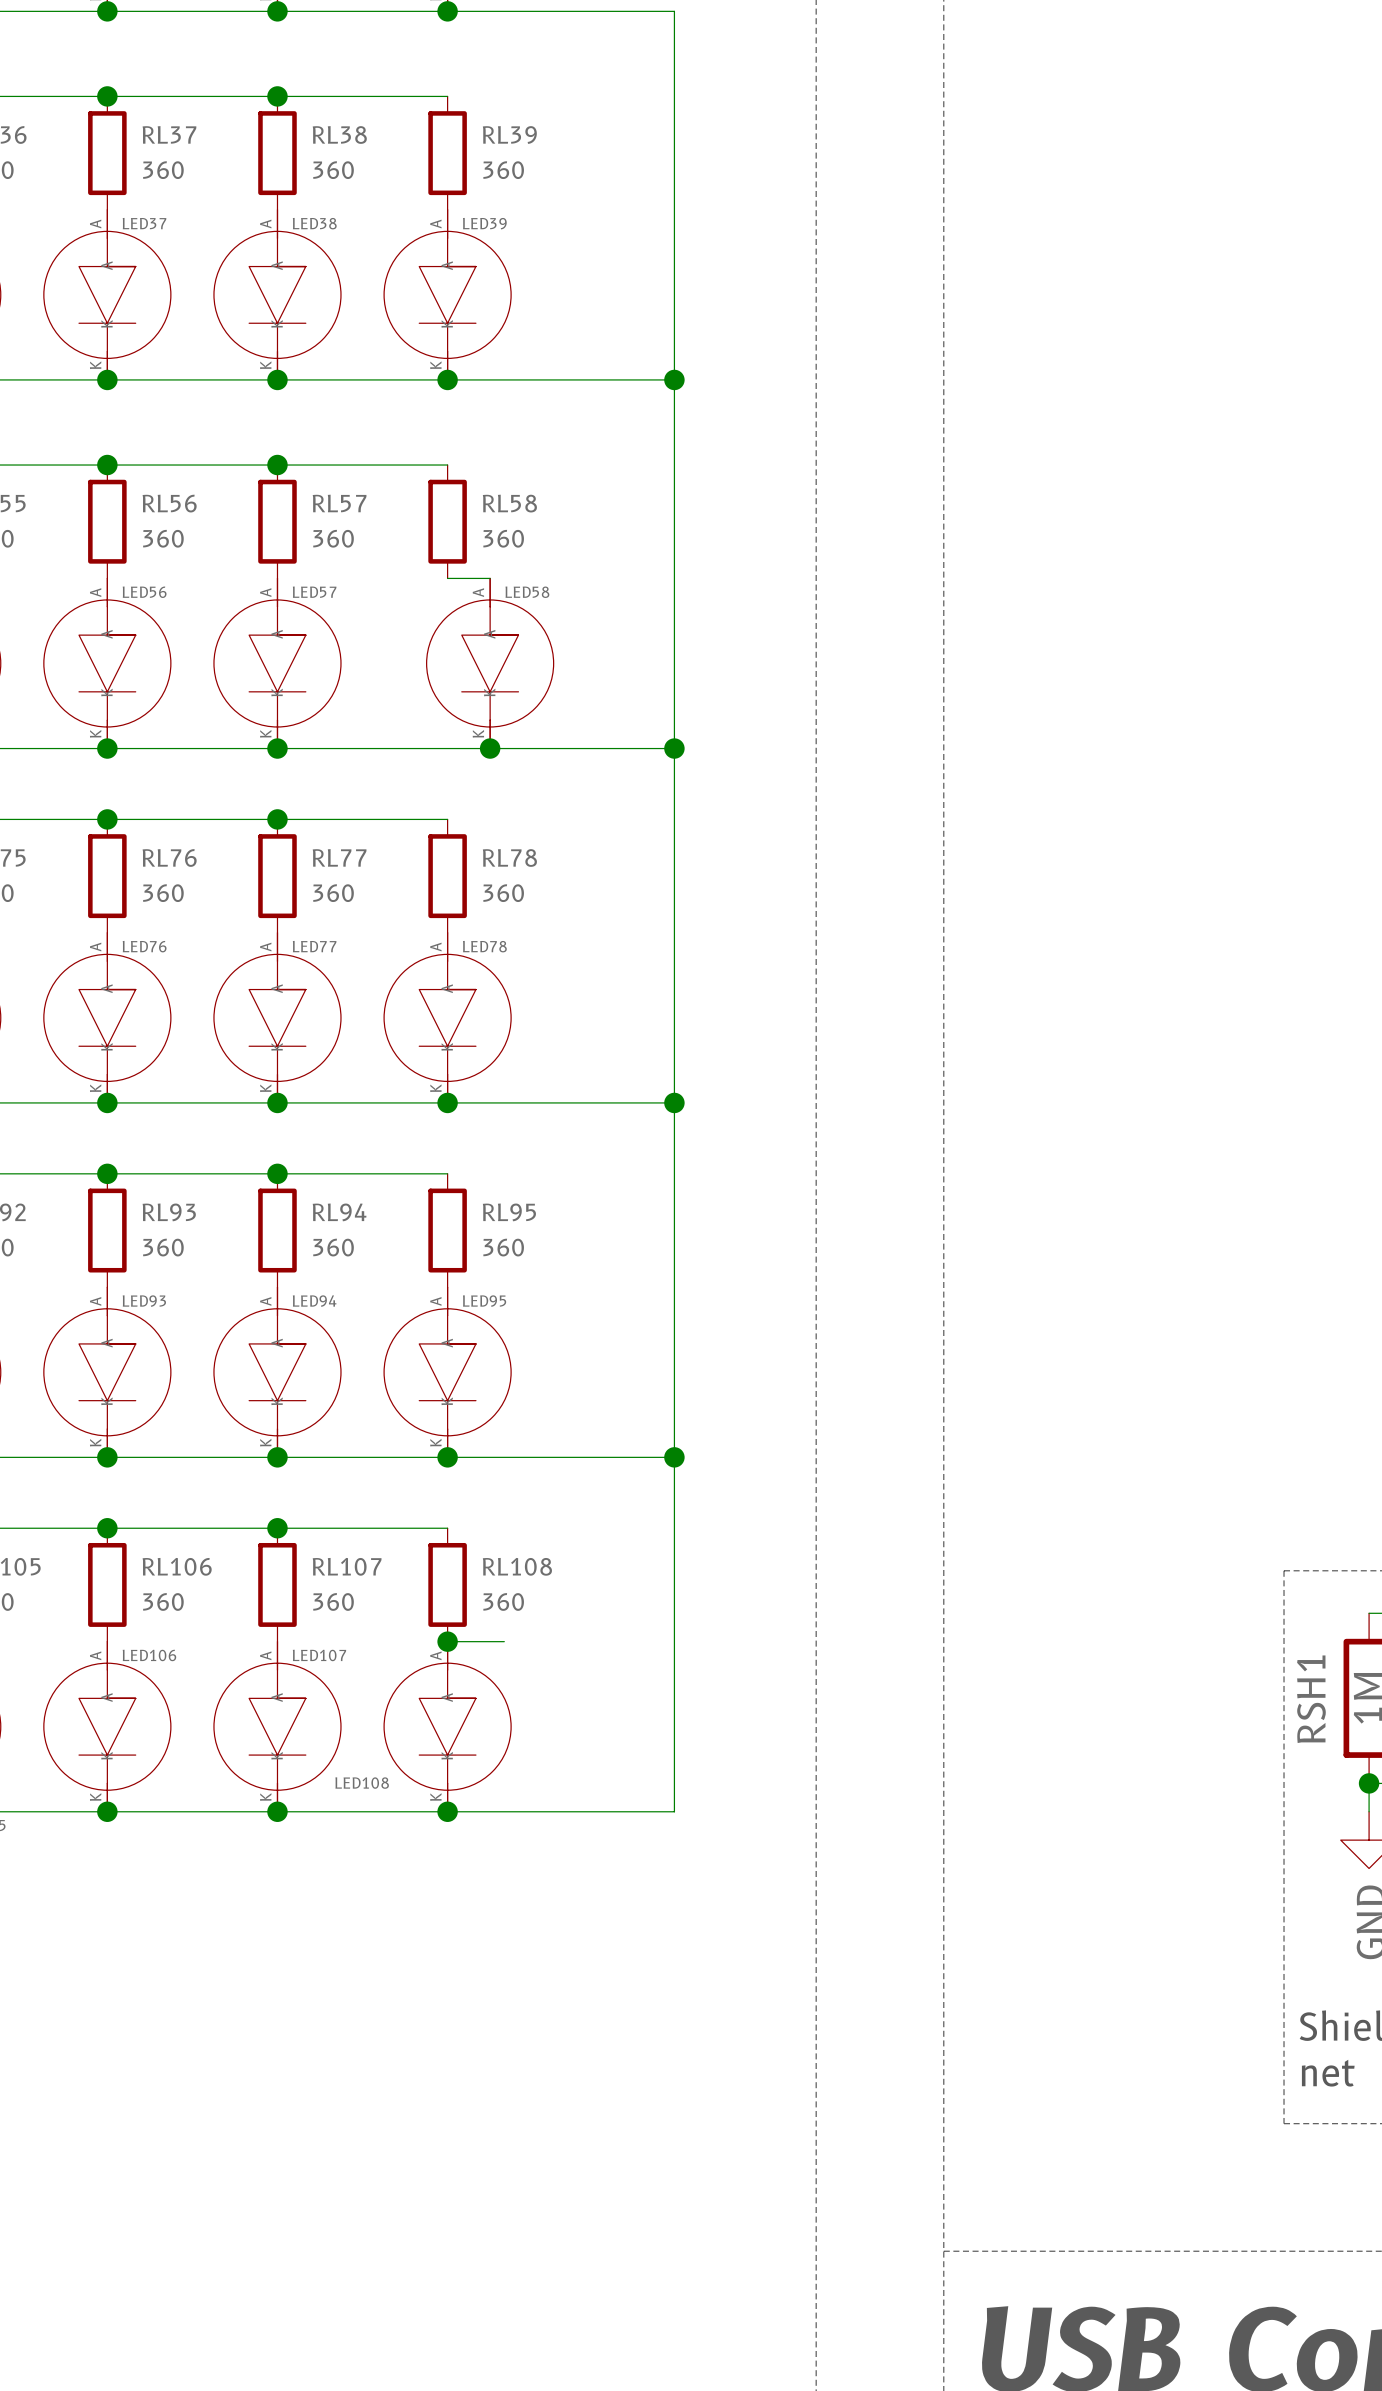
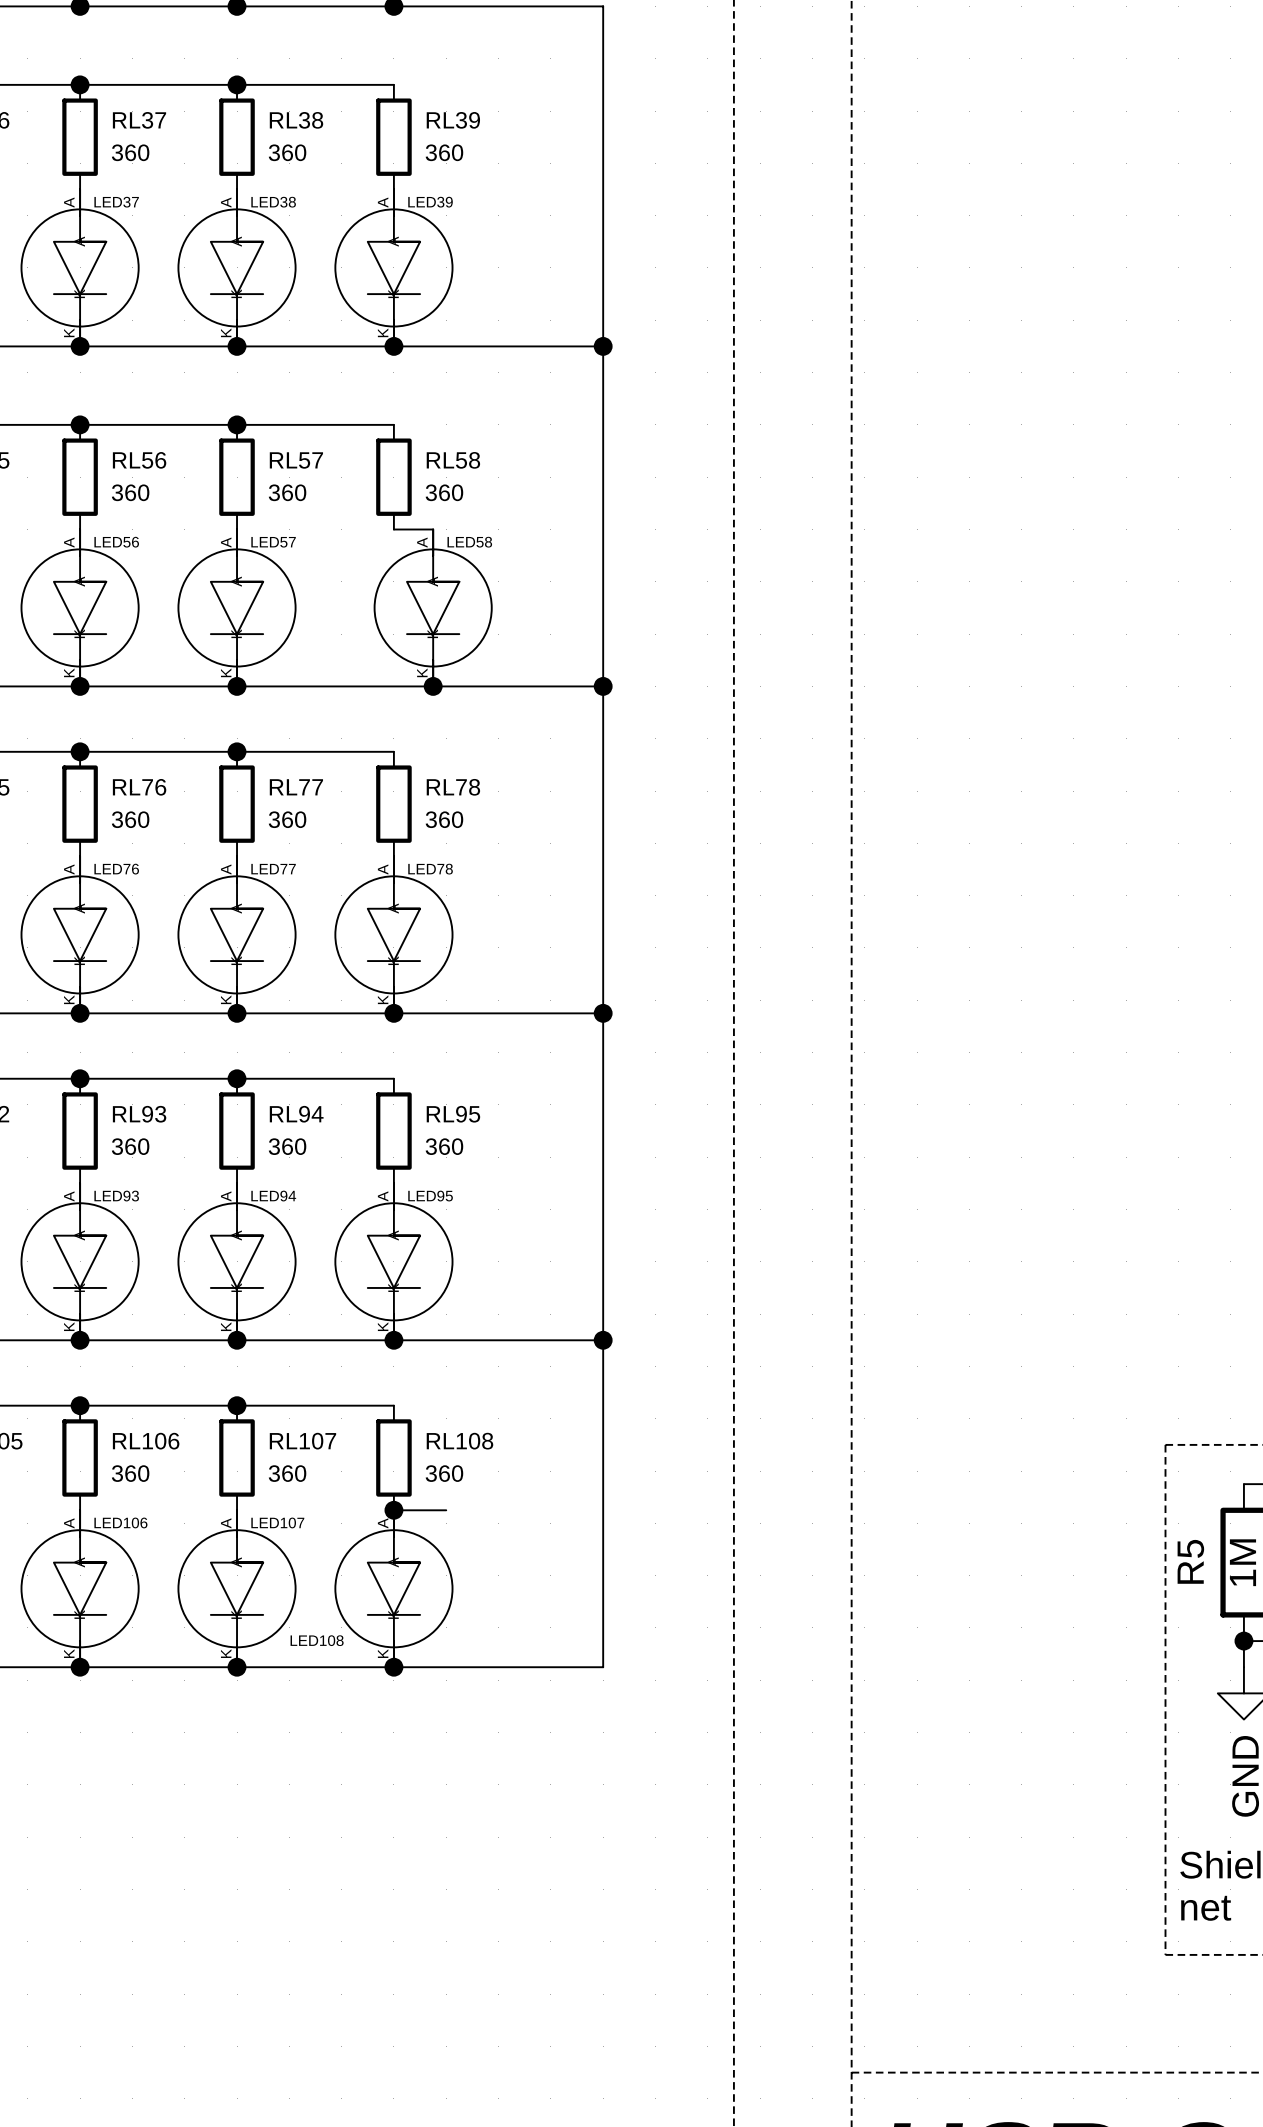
RSH1 name: RSH1 (1311, 1699) -> R5 (1190, 1561)

